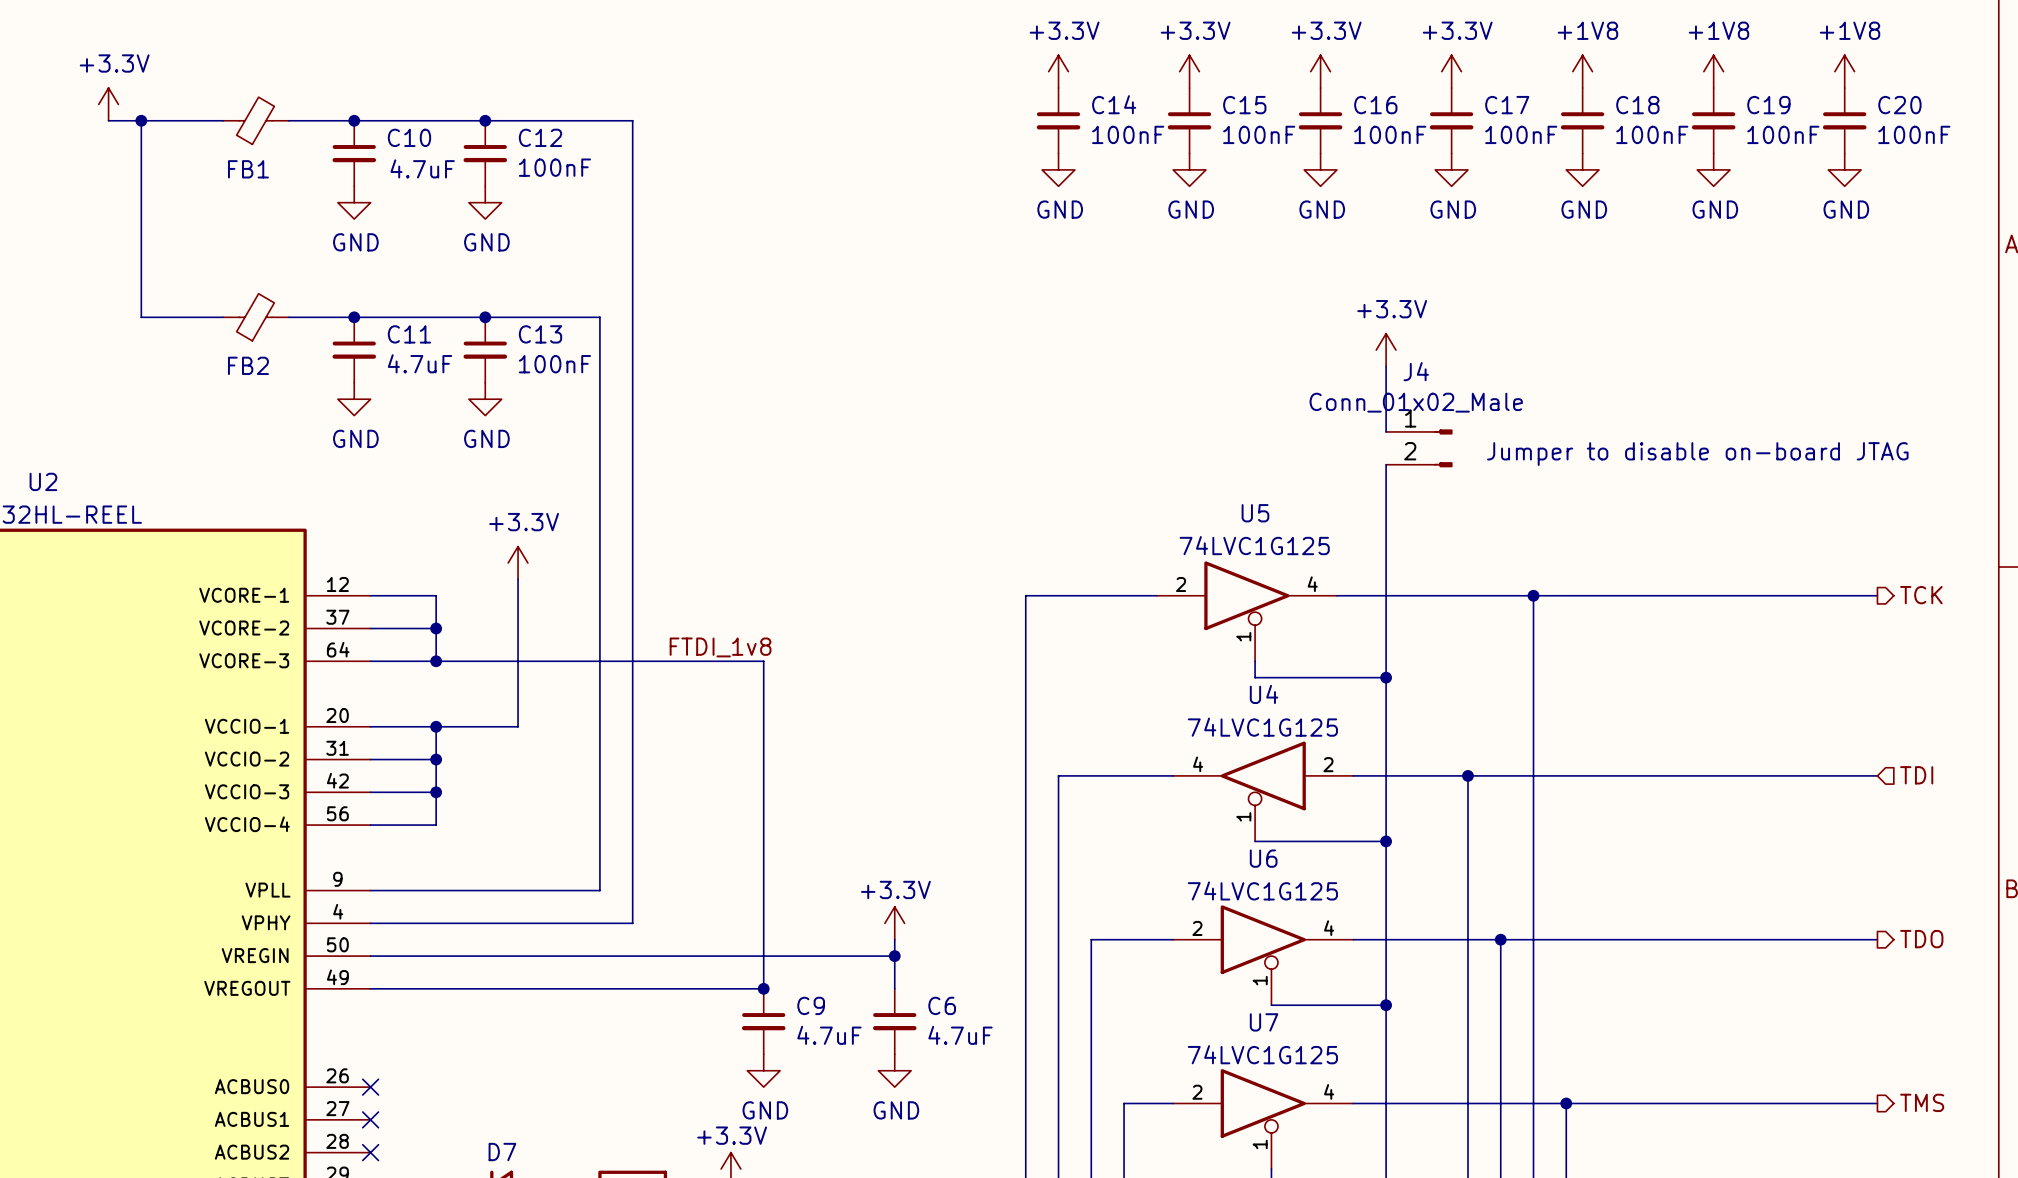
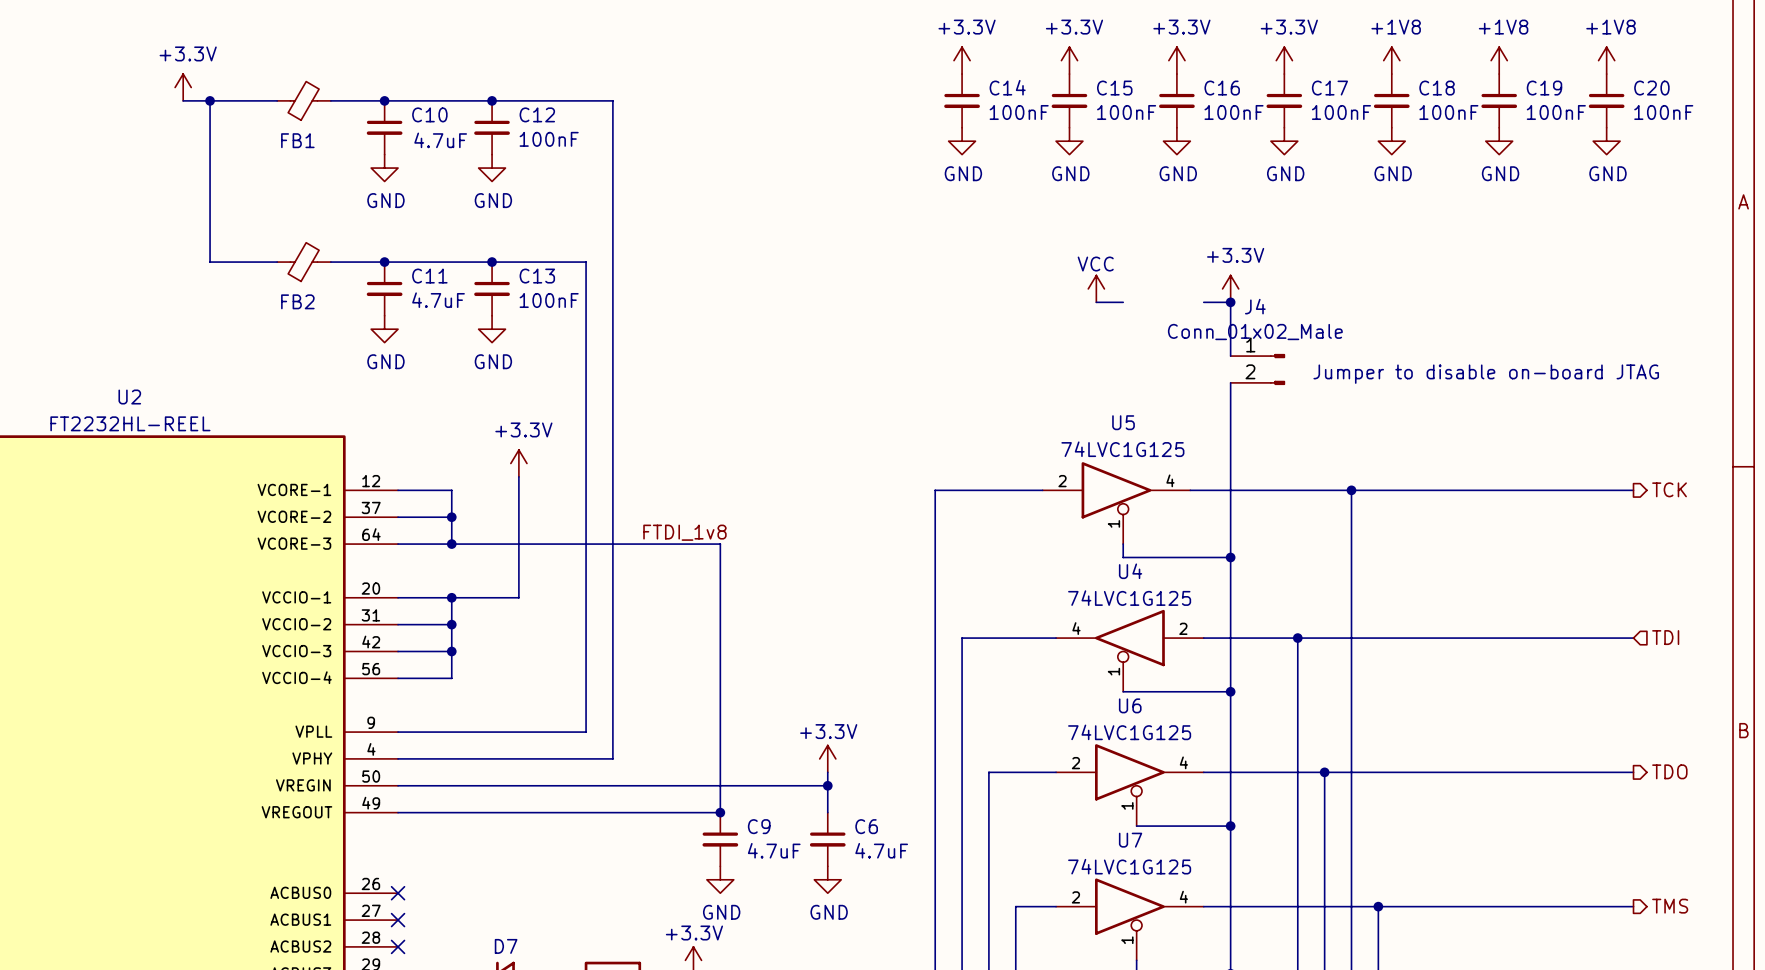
power symbol: none -> VCC (1096, 288)
wire: none -> (1096, 302) (1123, 302)
wire: none -> (1203, 302) (1230, 302)
junction: none -> (1230, 302)

